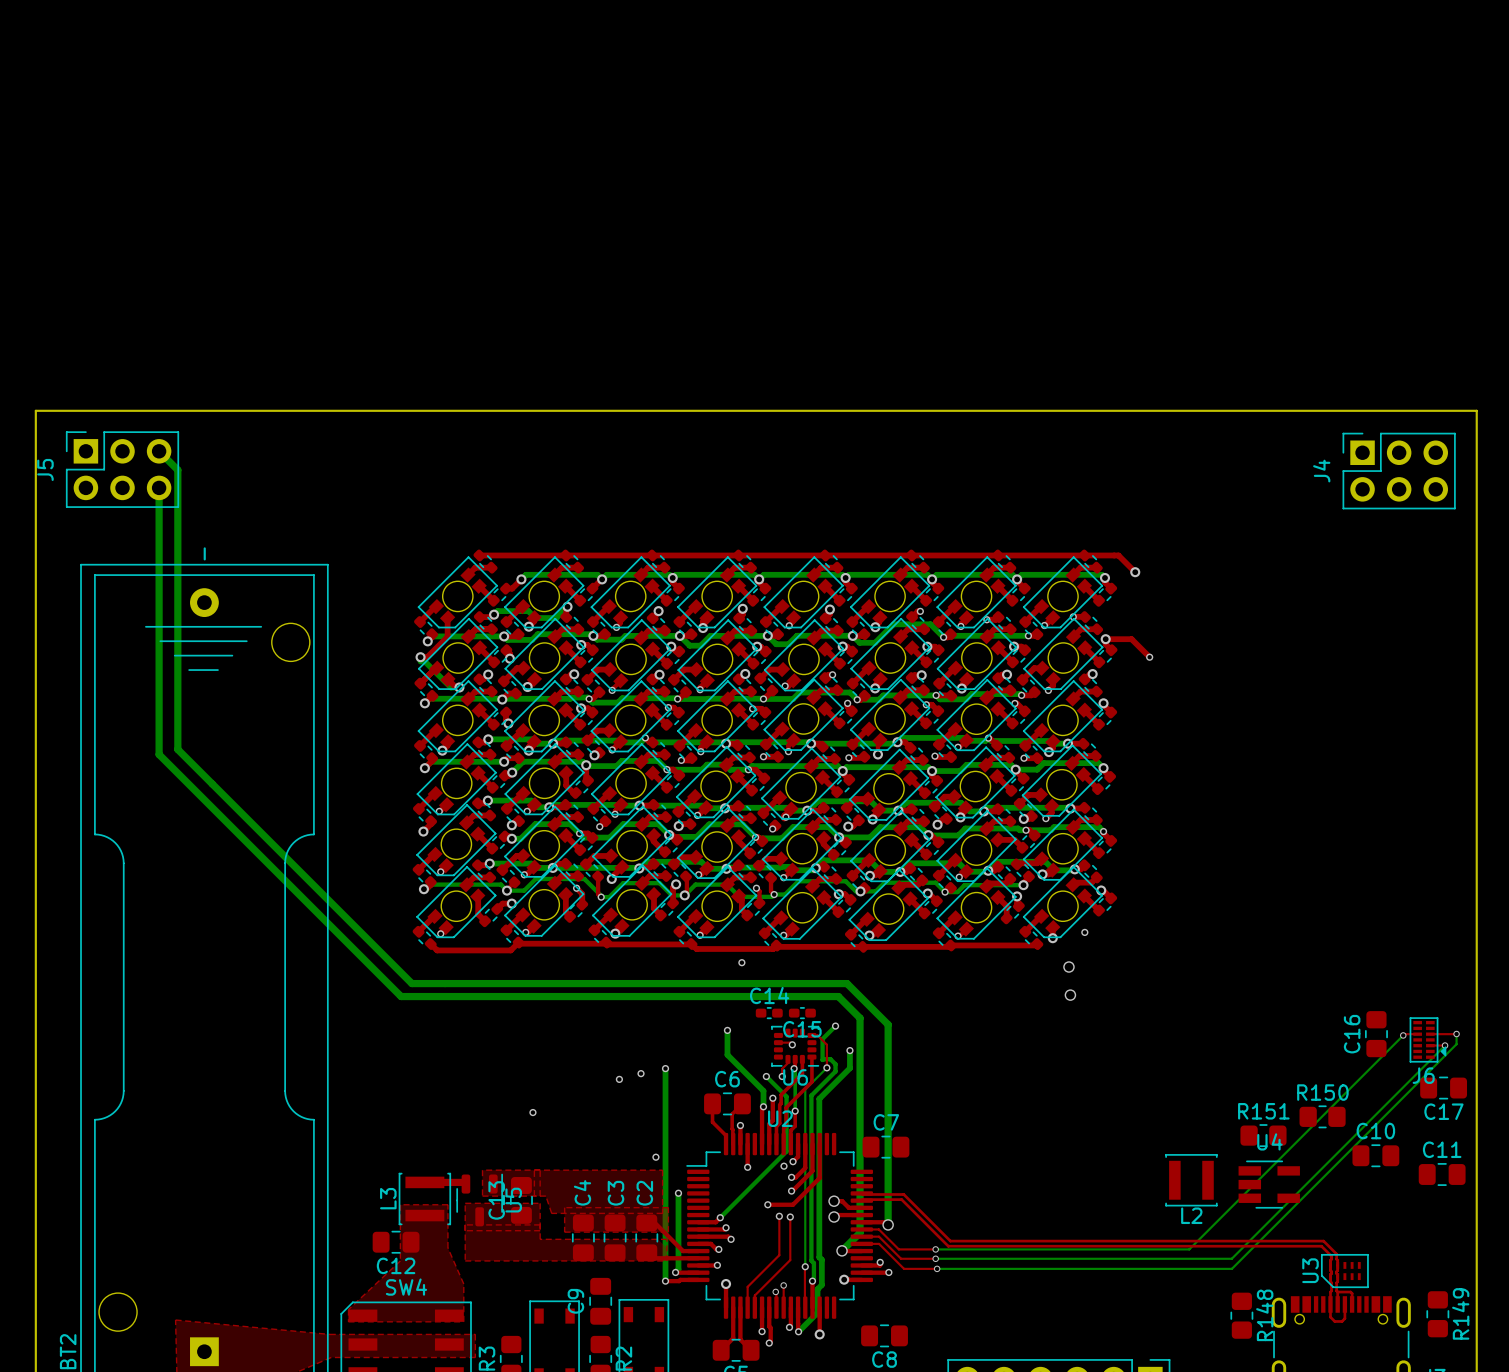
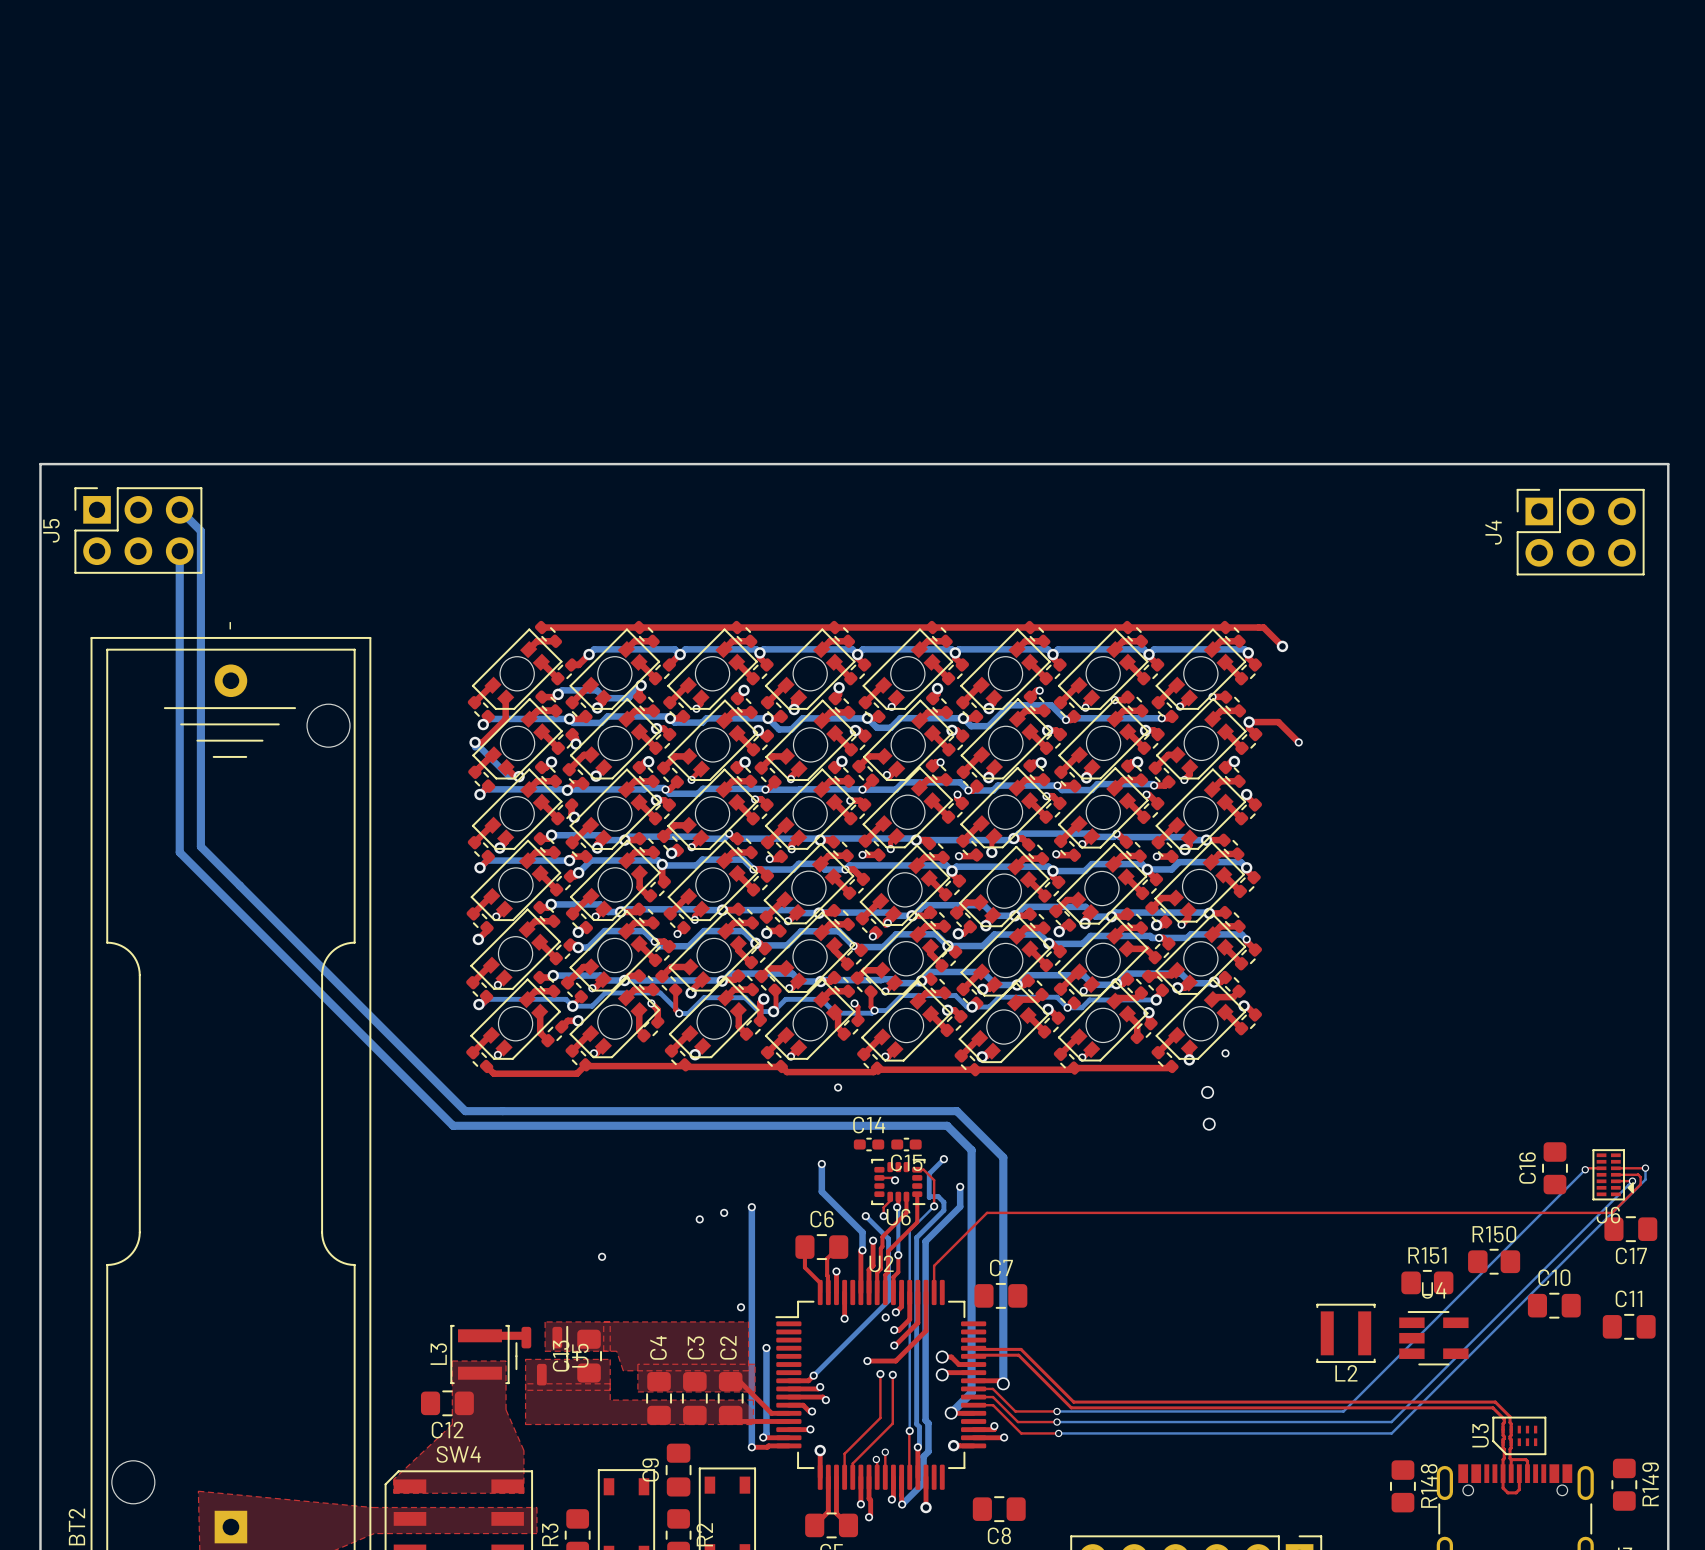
top track: none -> (1615, 1174) (1638, 1174)
top track: none -> (1638, 1174) (1640, 1177) (1640, 1184) (1612, 1212) (987, 1212) (934, 1265) (934, 1292)

